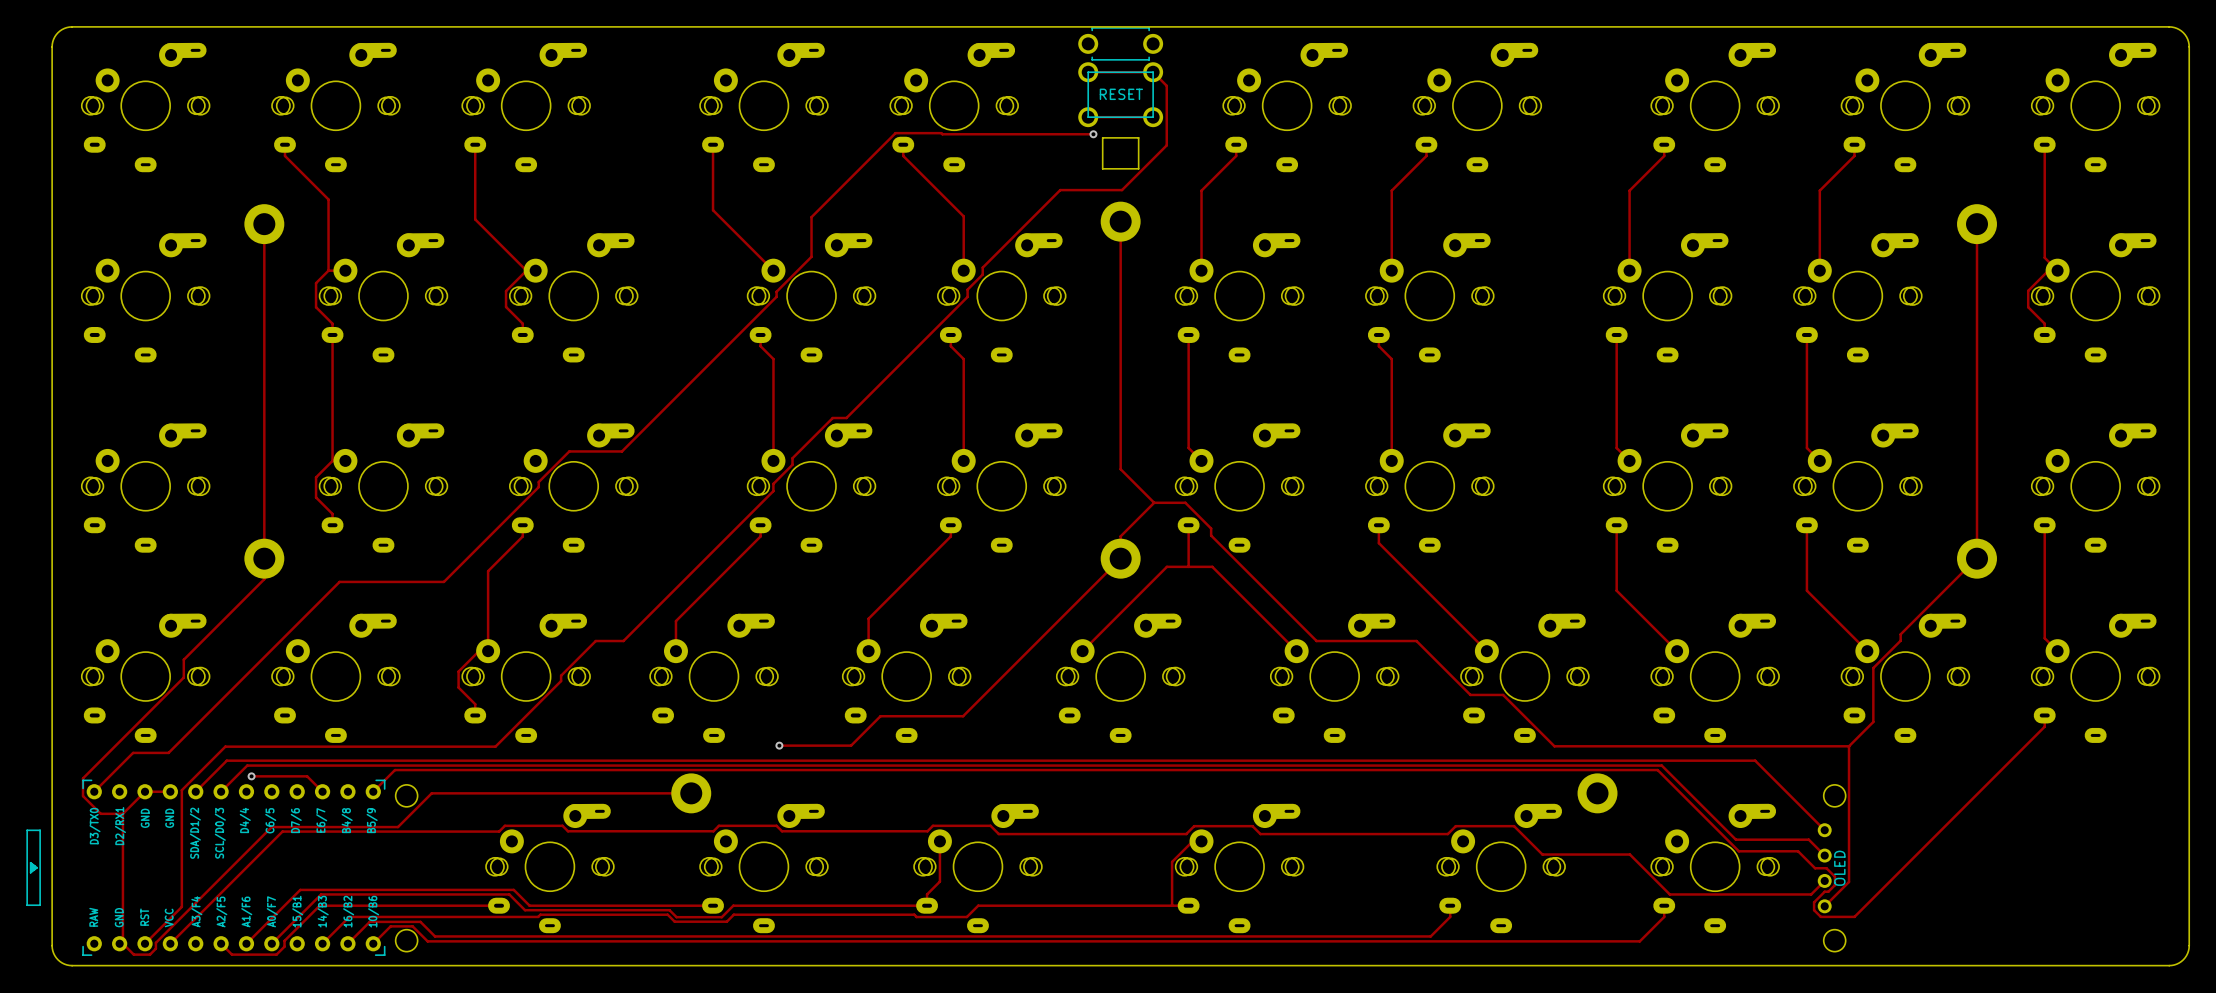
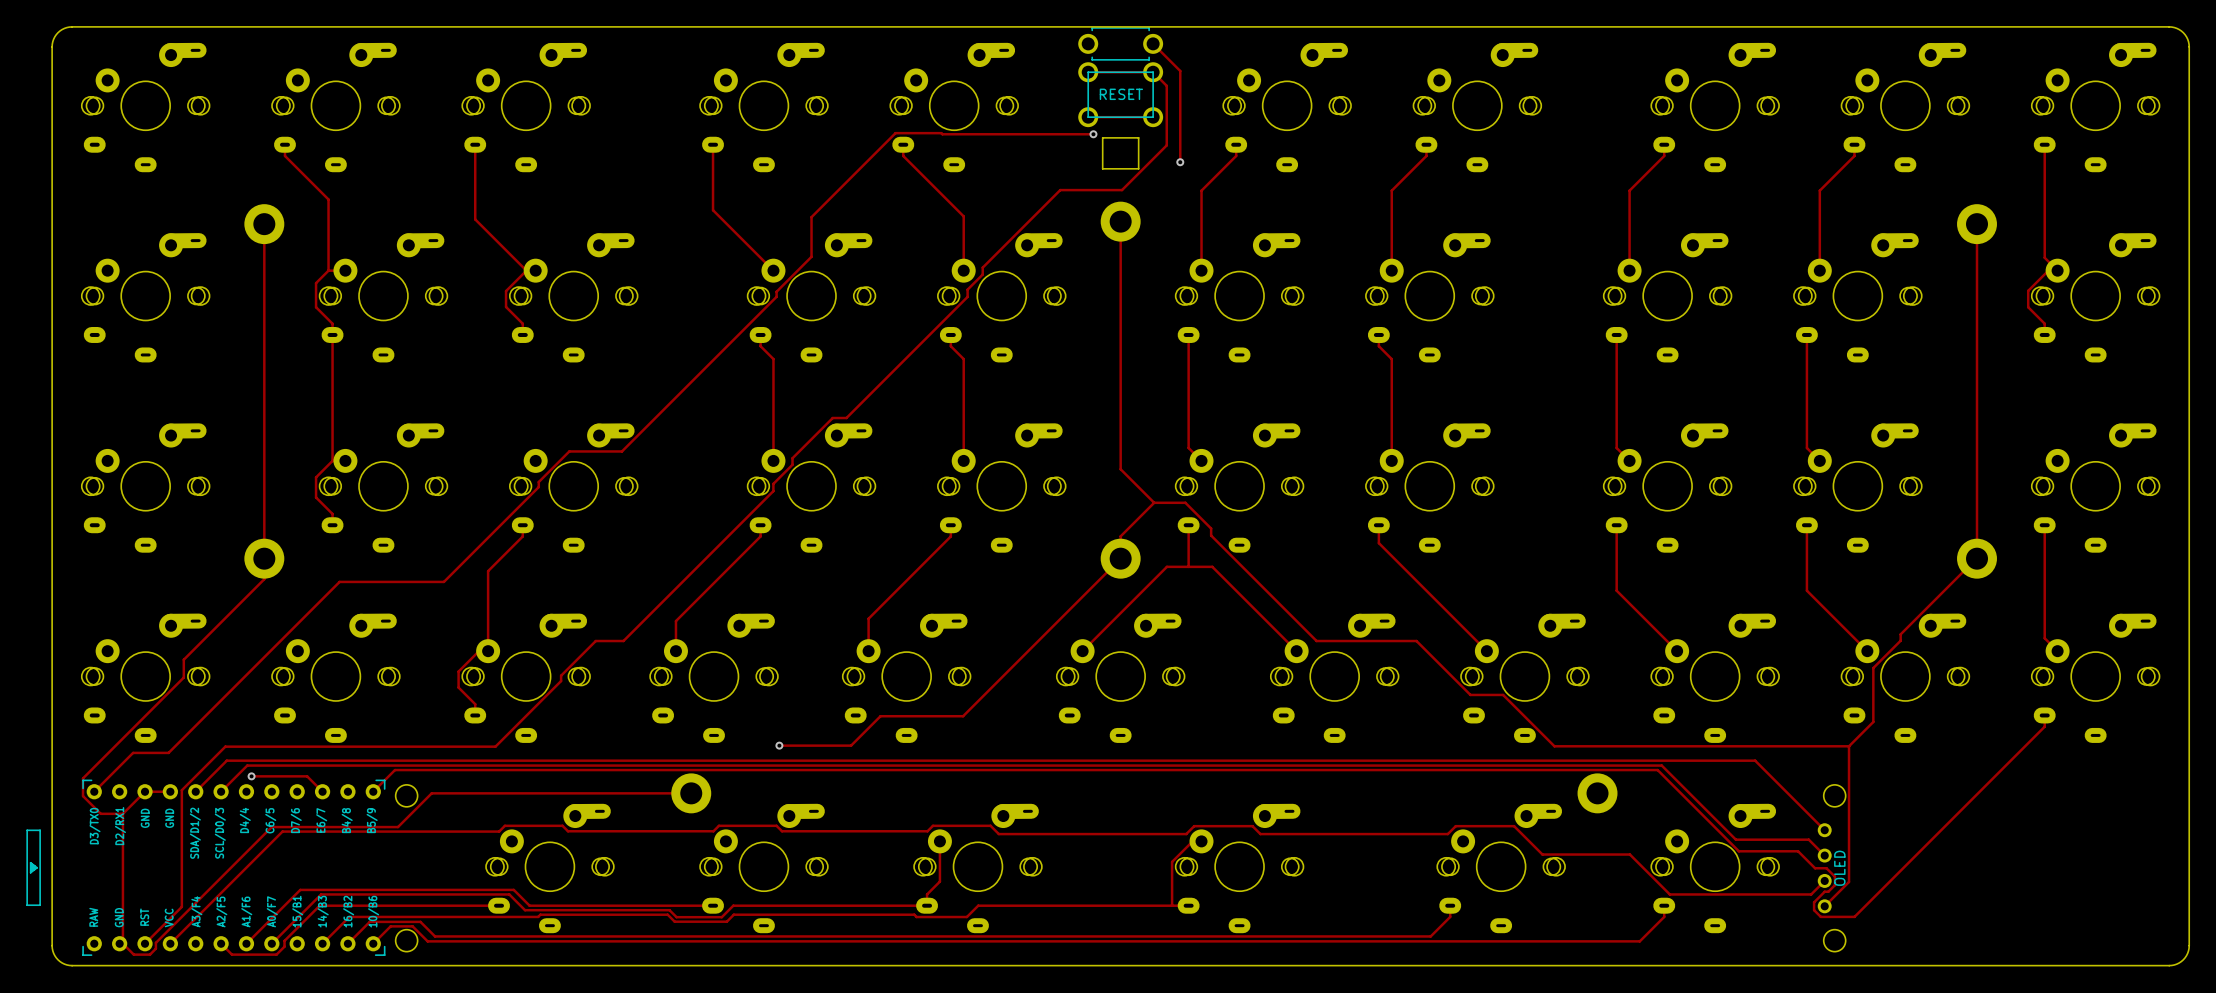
track: none -> (1153, 43) (1180, 71) (1180, 162)
via: none -> (1180, 162)

